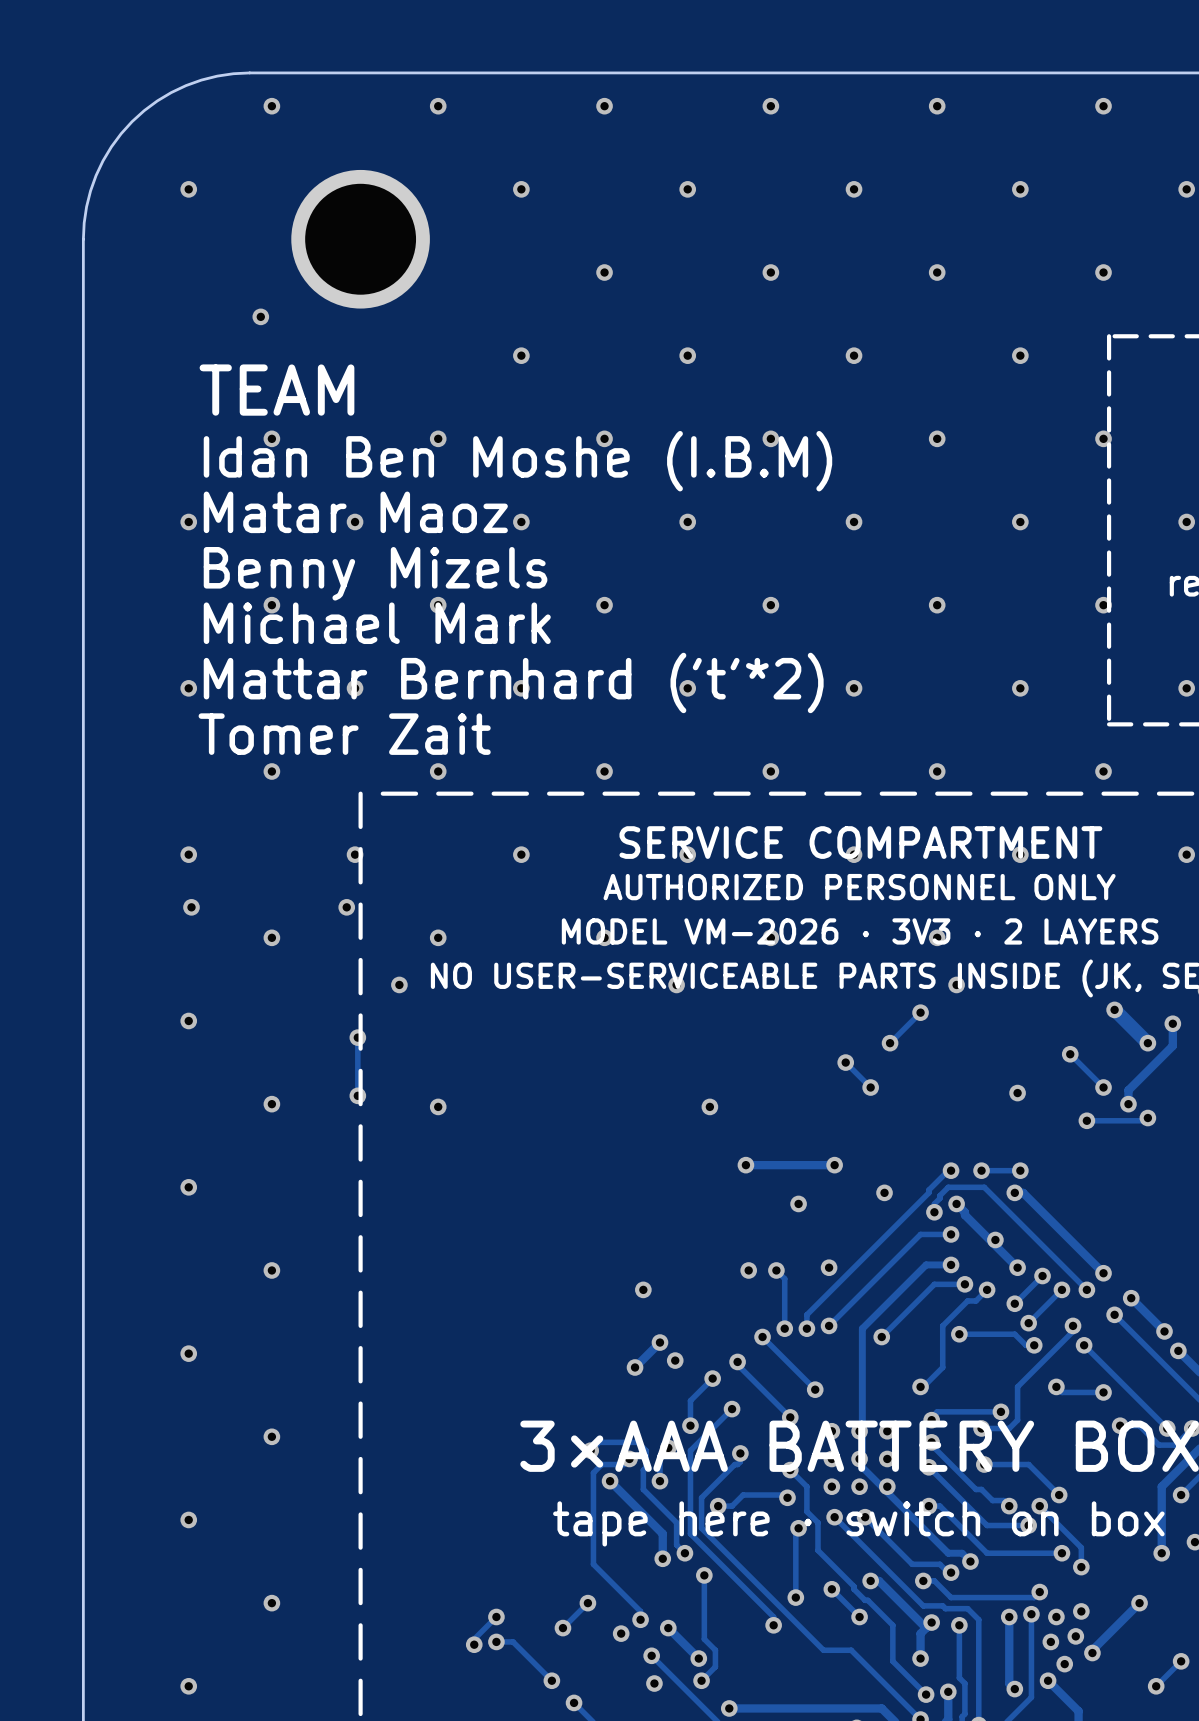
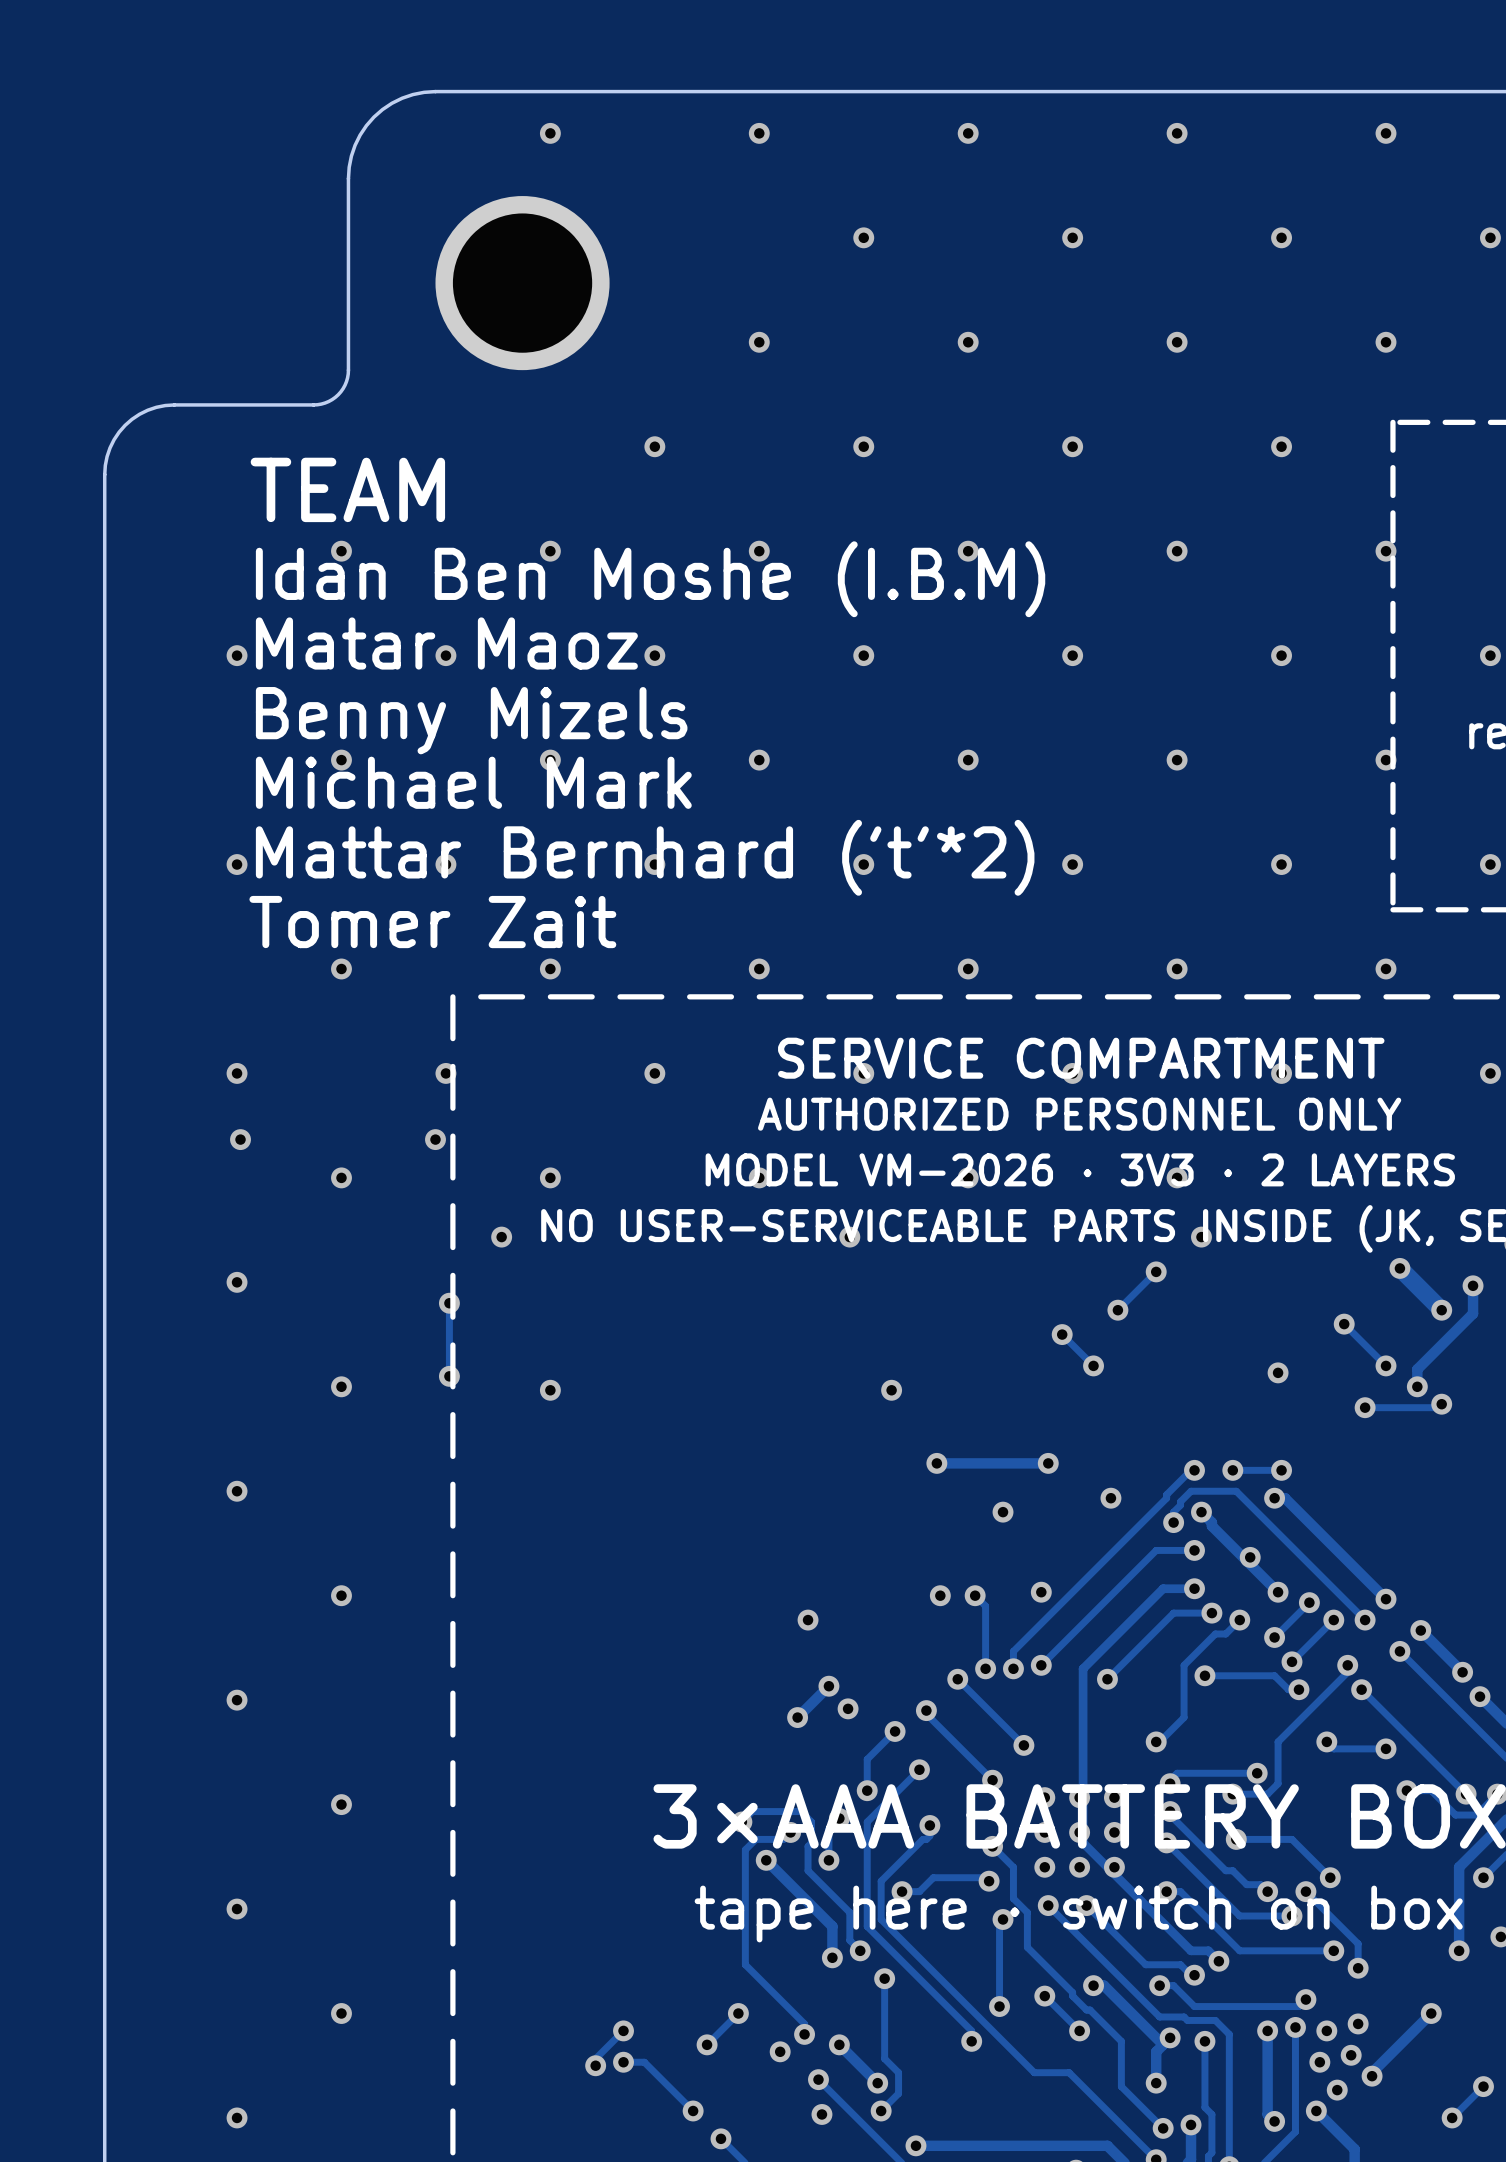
board edge: (346, 72) (233, 73) (201, 80) (171, 92) (157, 100) (144, 110) (121, 133) (111, 146) (96, 175) (86, 206) (83, 239) (83, 377) -> (435, 91) (402, 98) (382, 109) (366, 125) (351, 156) (348, 178) (348, 370) (346, 381) (340, 391) (328, 401) (317, 404) (174, 404) (147, 410) (131, 419) (119, 432) (110, 447) (104, 474)
via: (271, 106) -> none
via: (188, 189) -> none
via: (521, 189) -> none
part position: (360, 239) -> (522, 283)
via: (260, 316) -> none

